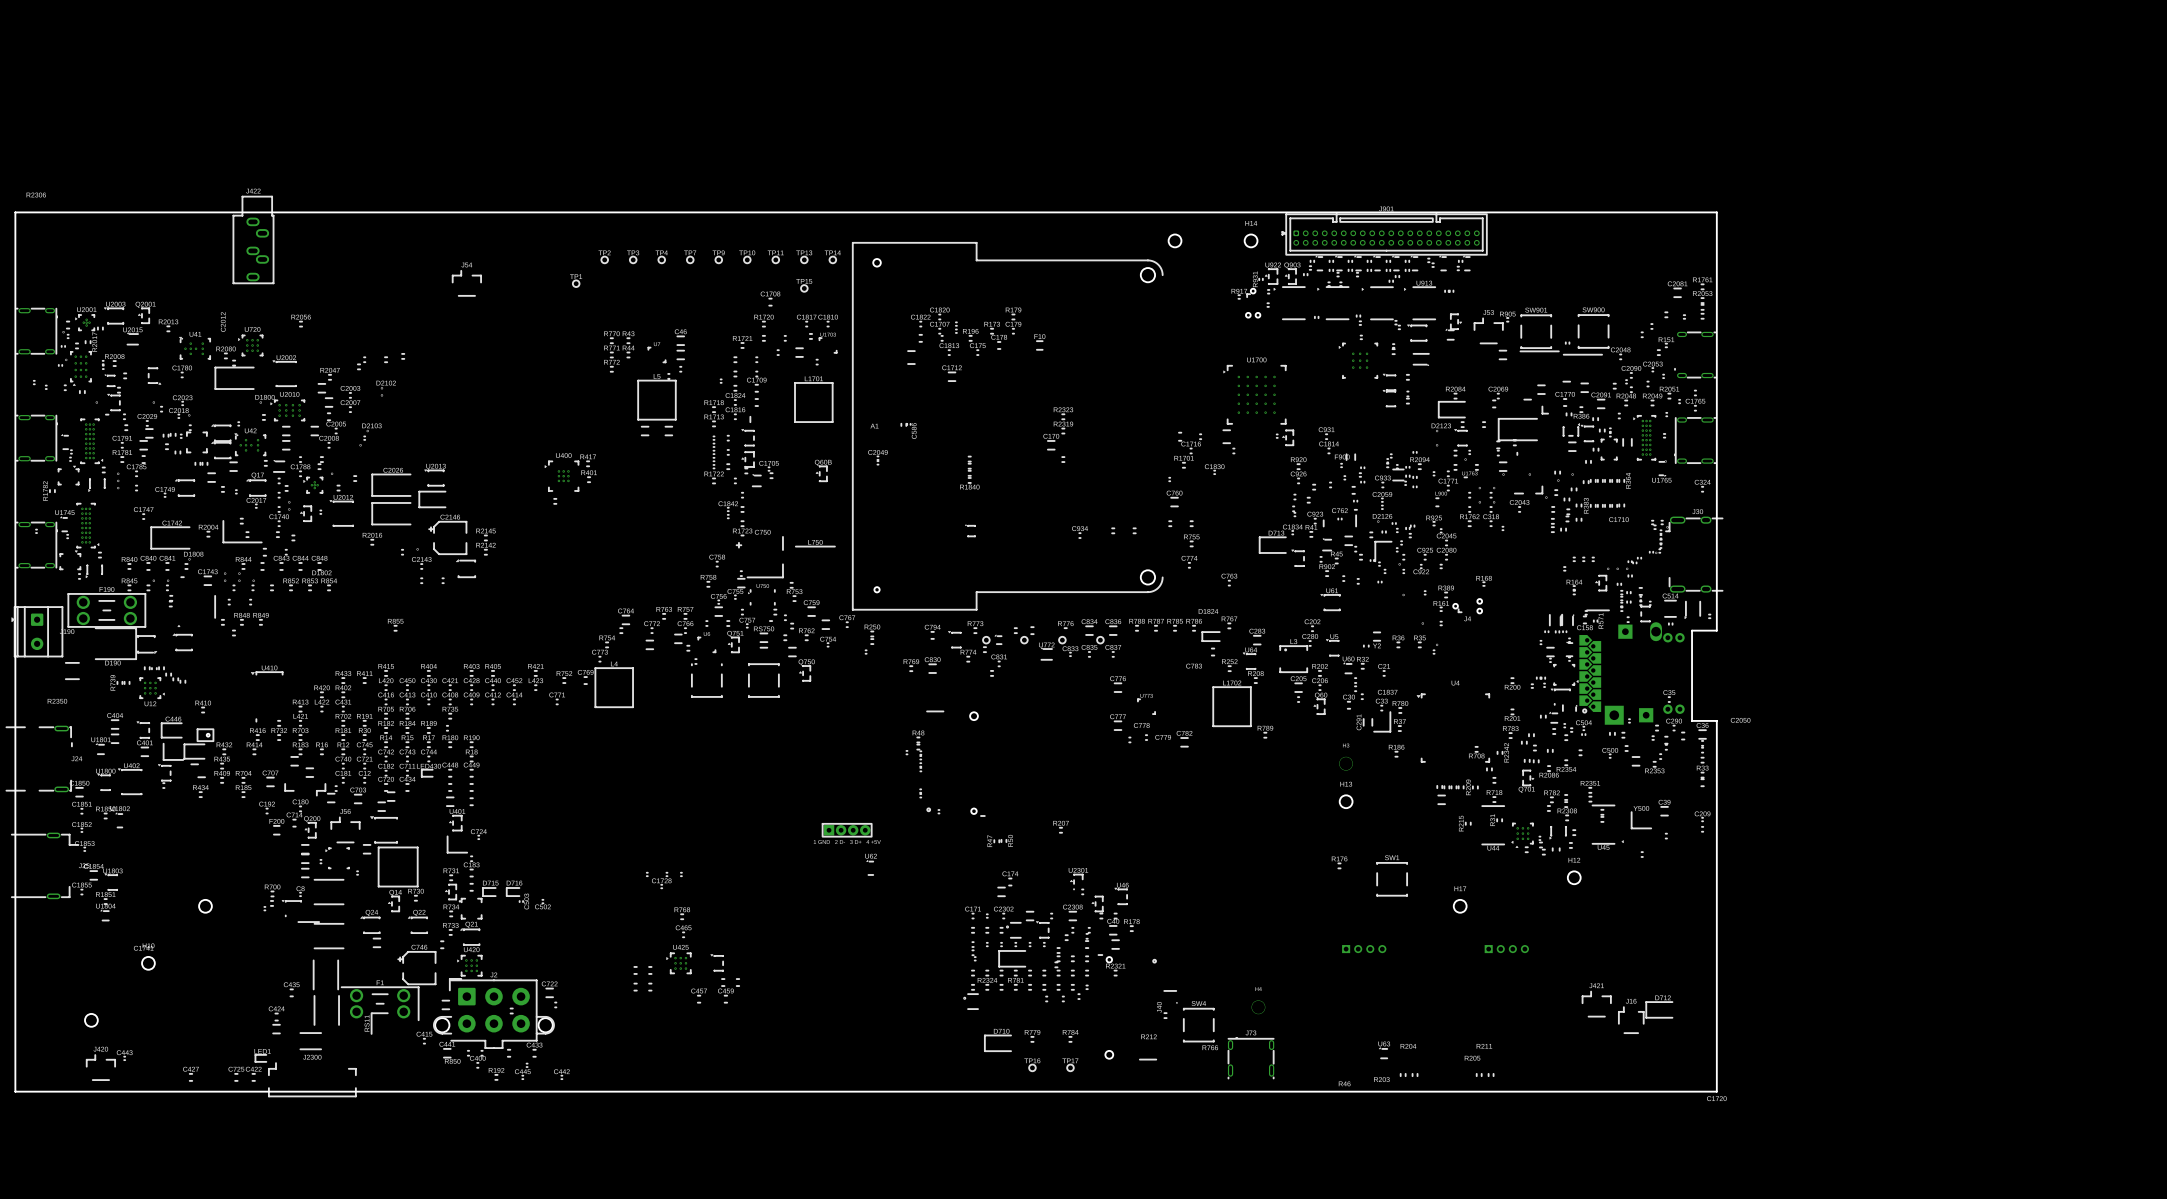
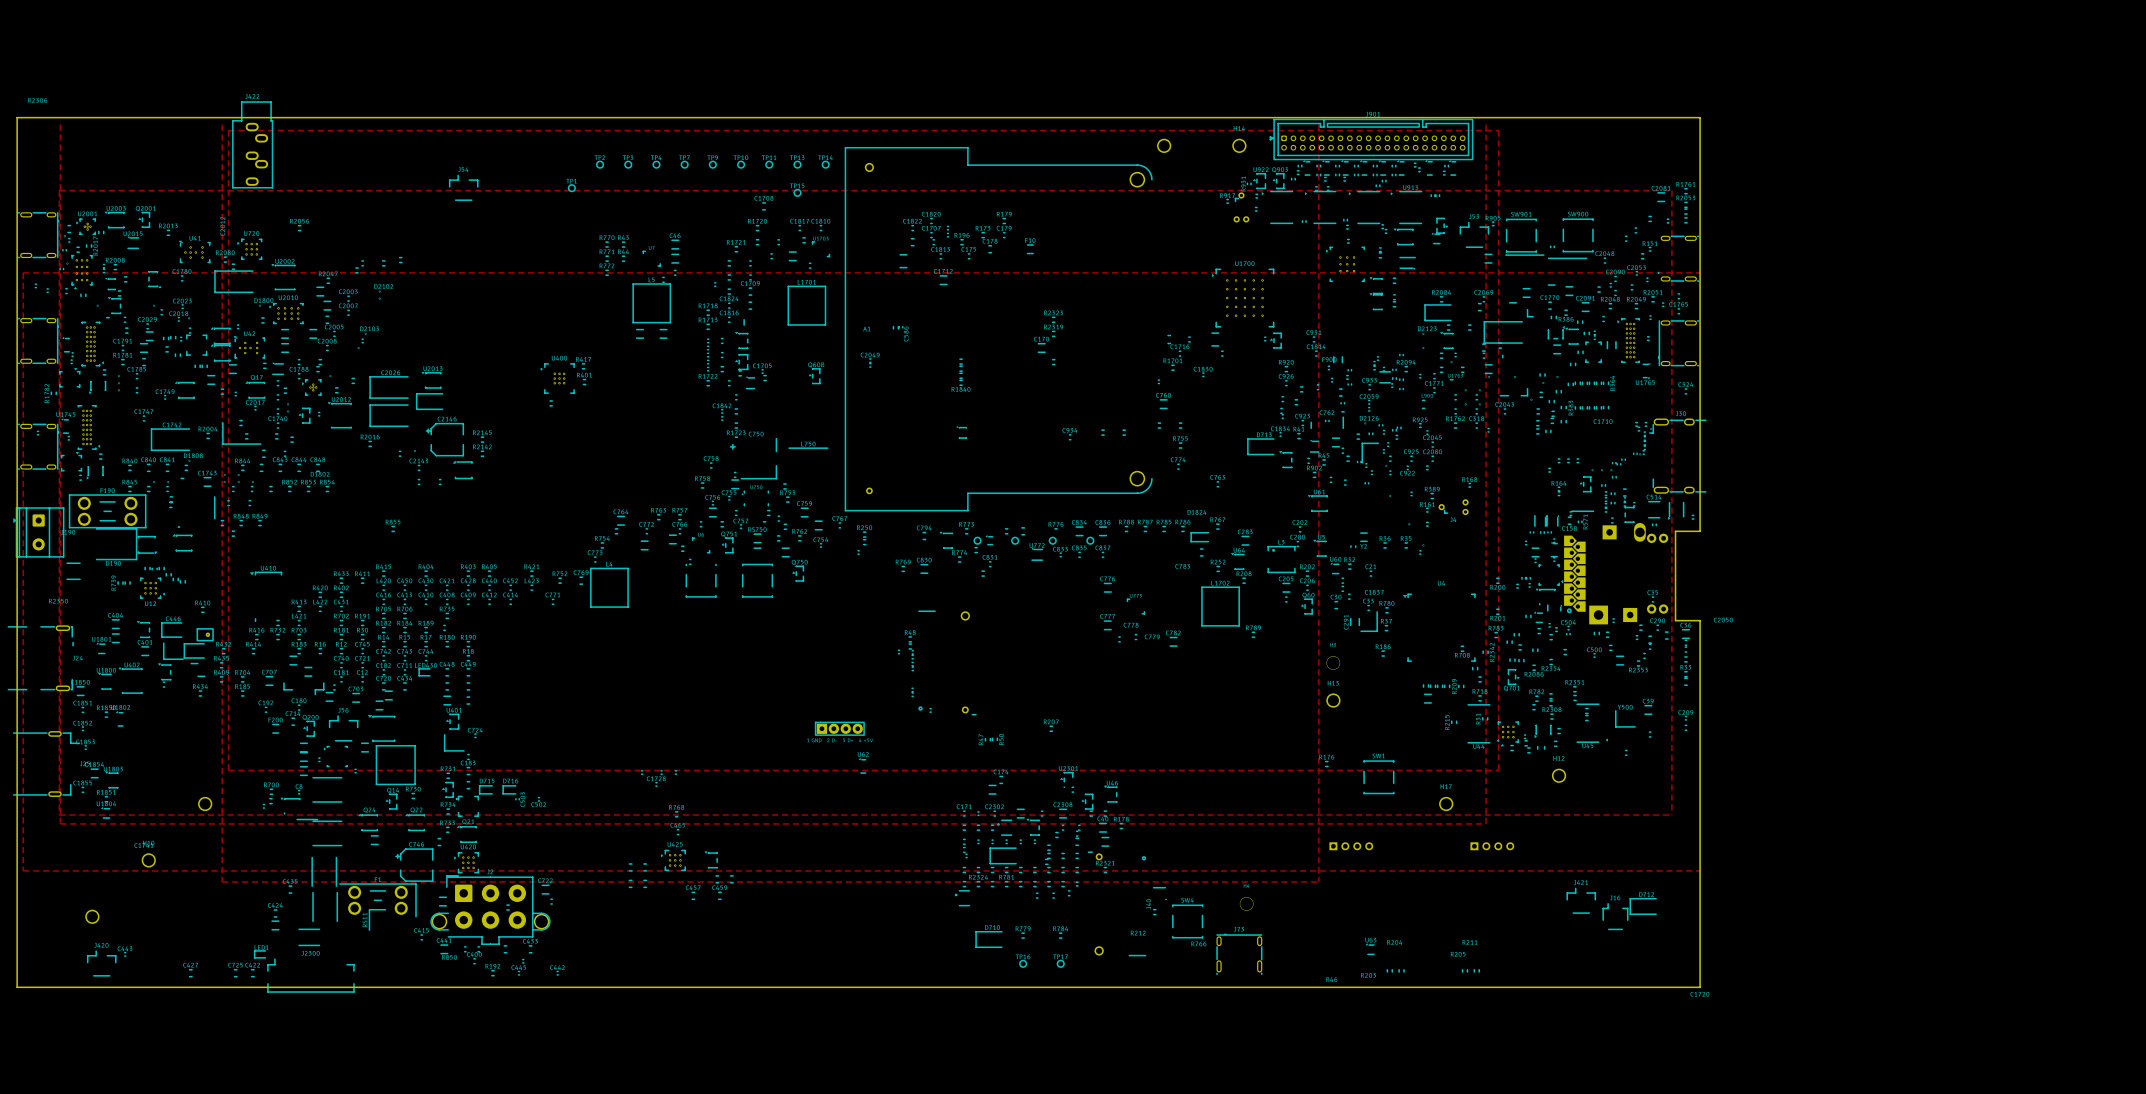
zone outline: none -> (60, 124) (60, 823) (1486, 823) (1486, 124)
zone outline: none -> (222, 124) (222, 882) (1318, 882) (1318, 124)
zone outline: none -> (228, 130) (1498, 130) (1498, 770) (228, 770) (228, 130)
zone outline: none -> (59, 190) (1671, 190) (1671, 815) (59, 815) (59, 190)
zone outline: none -> (1700, 272) (23, 272) (23, 870) (1700, 870)

